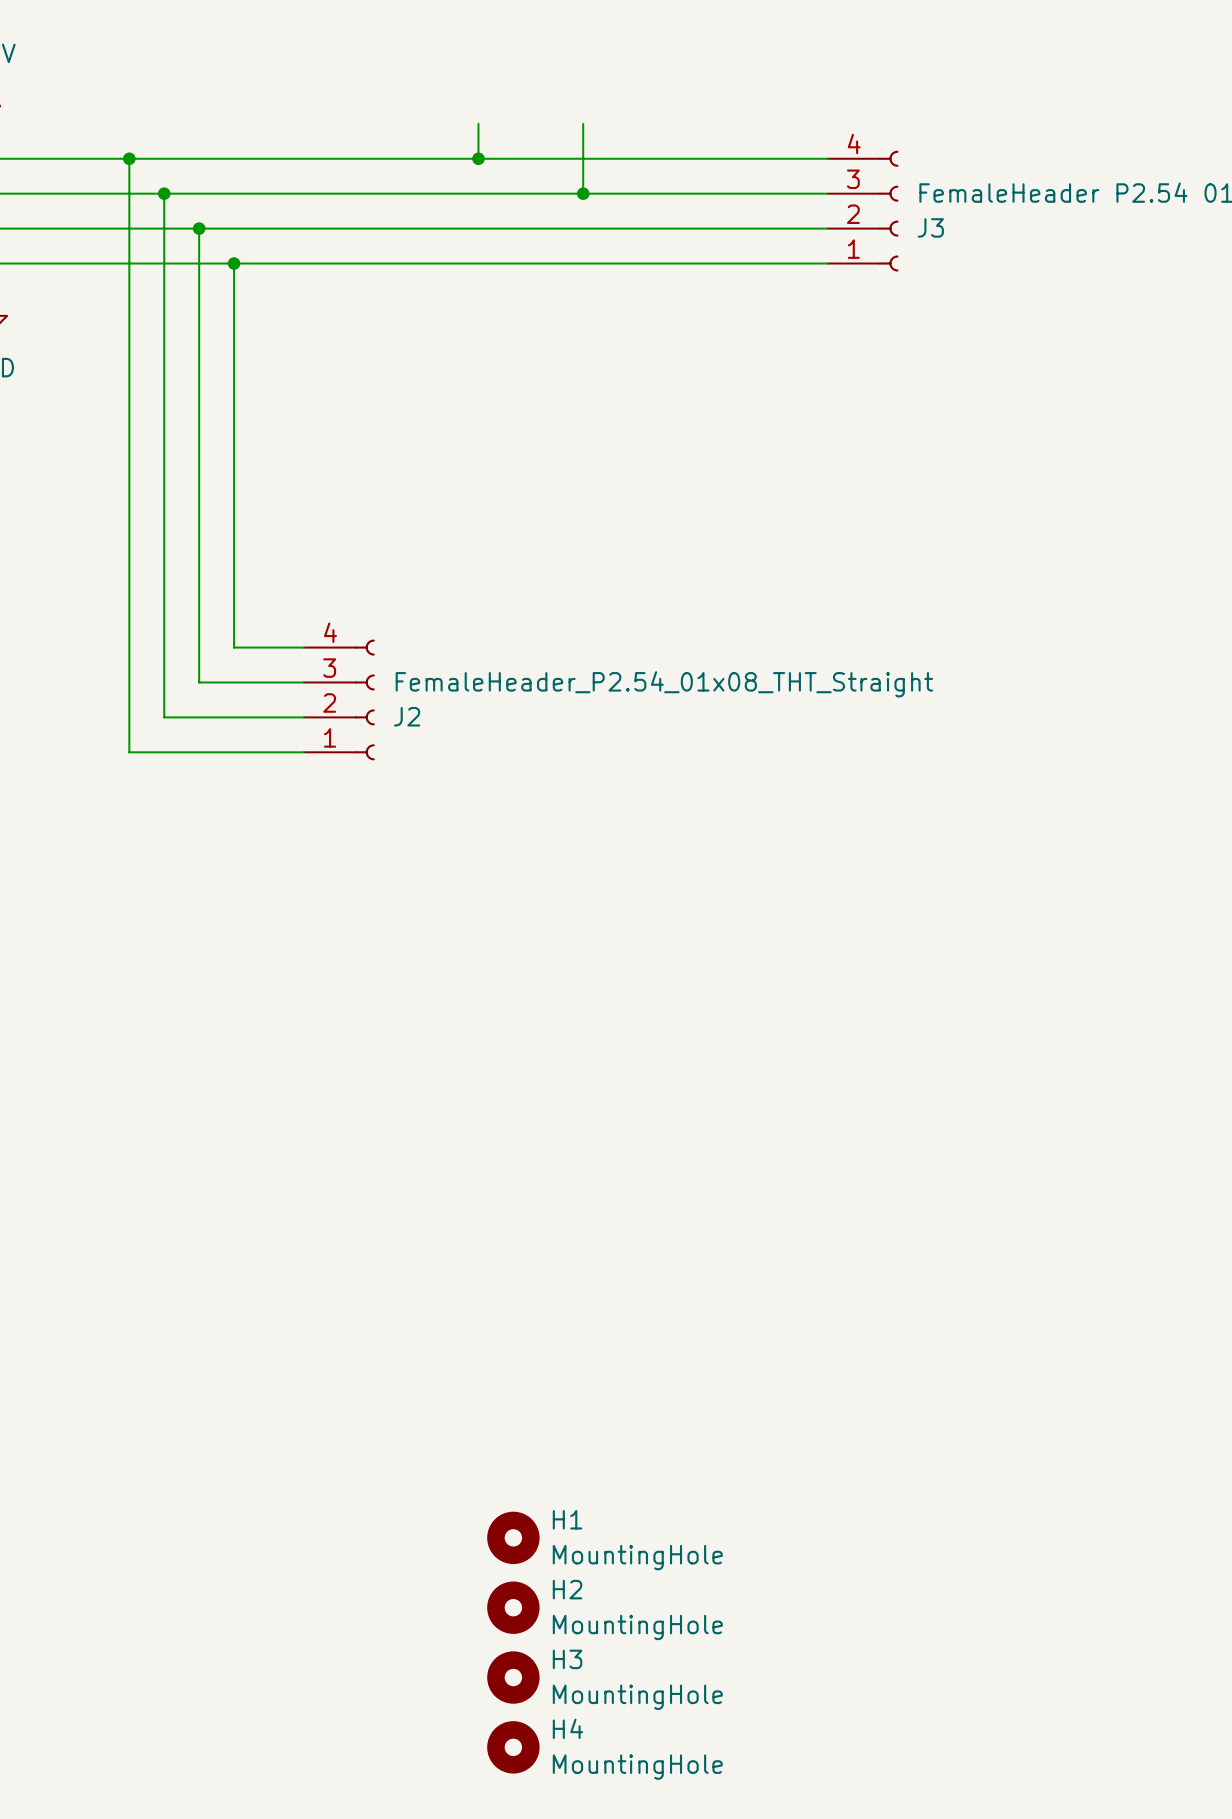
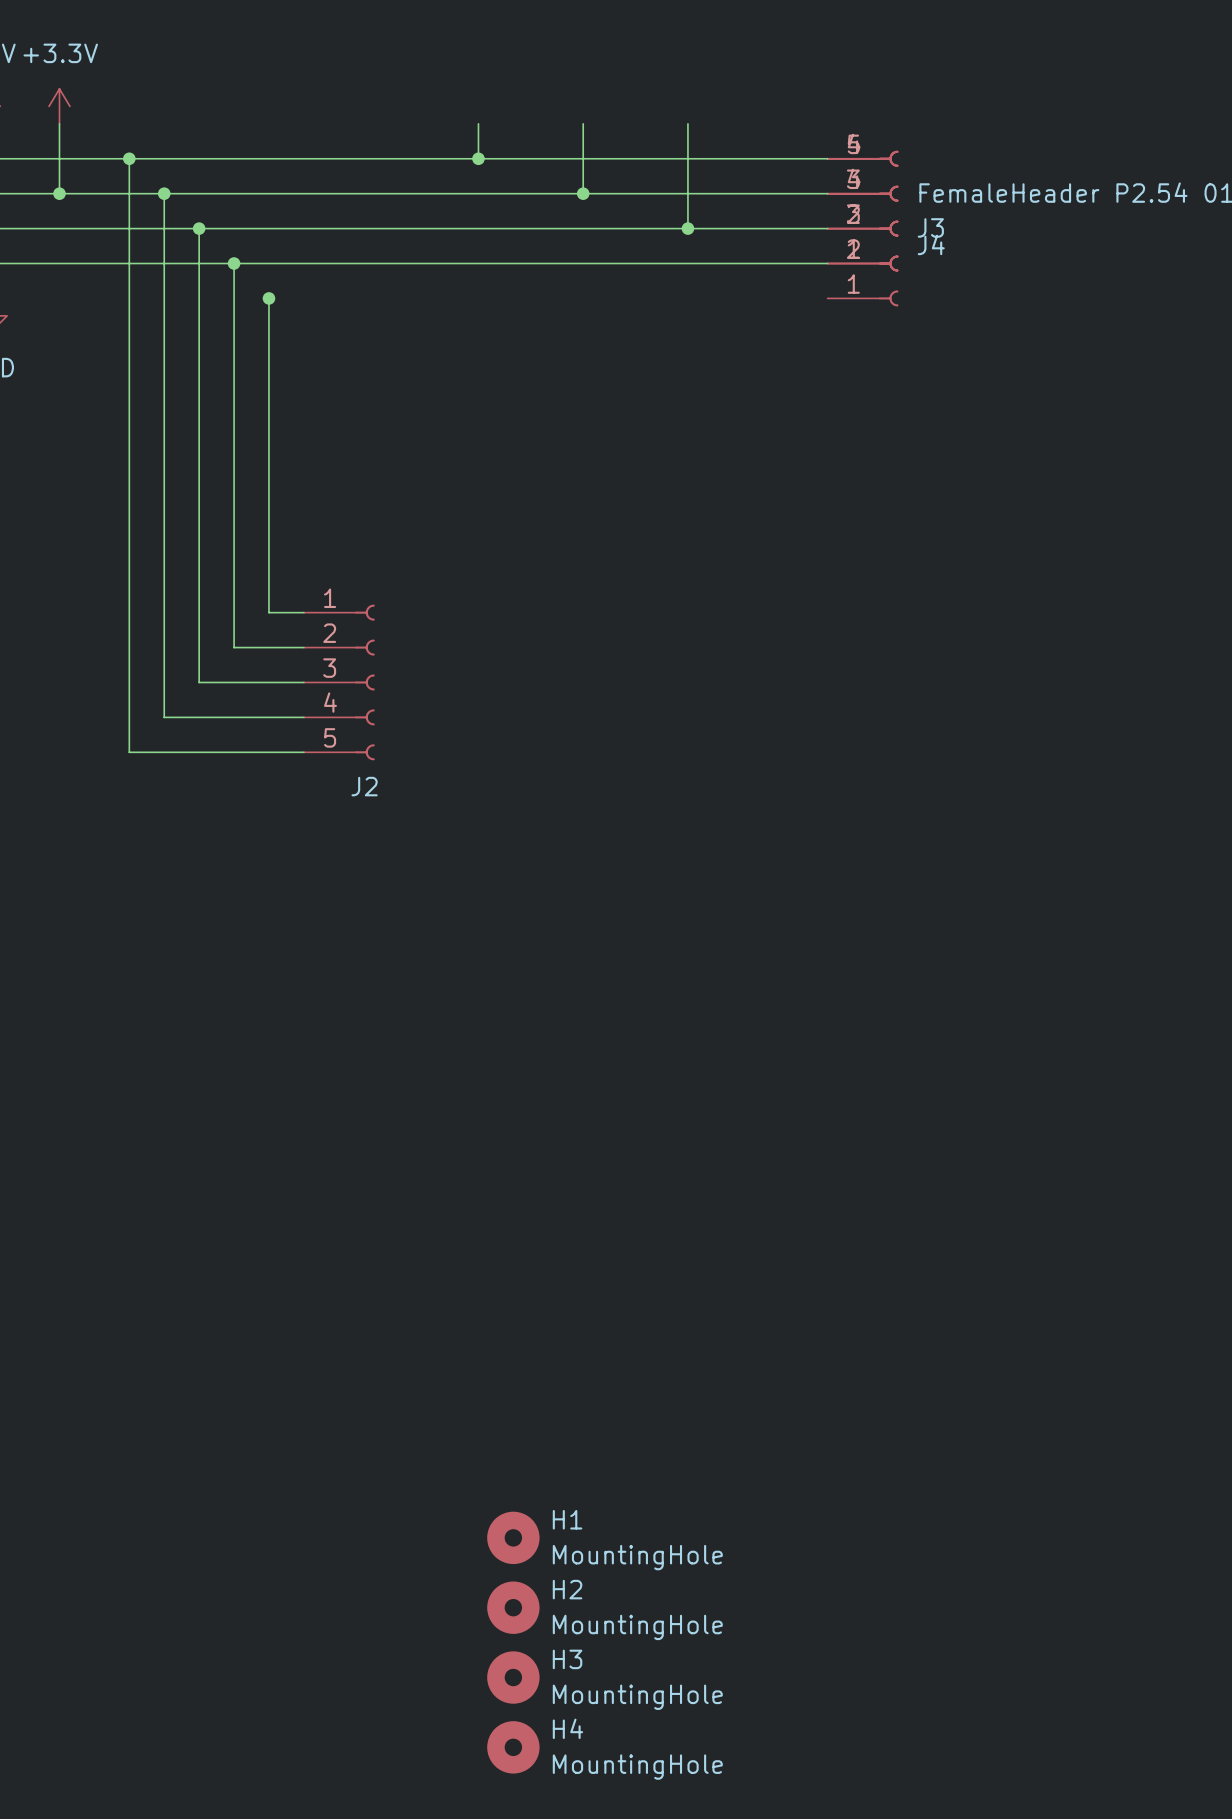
power symbol: none -> +3.3V (59, 106)
wire: none -> (59, 123) (59, 193)
wire: none -> (687, 123) (687, 228)
junction: none -> (59, 193)
junction: none -> (687, 228)
J4: none -> (863, 228)
wire: none -> (268, 298) (268, 612) (303, 612)
junction: none -> (268, 298)
J2 symbol: [303, 639, 375, 761] -> [303, 604, 375, 761]
J2 value: FemaleHeader_P2.54_01x08_THT_Straight (664, 684) -> none
J2 name position: J2 (407, 716) -> J2 (364, 786)

